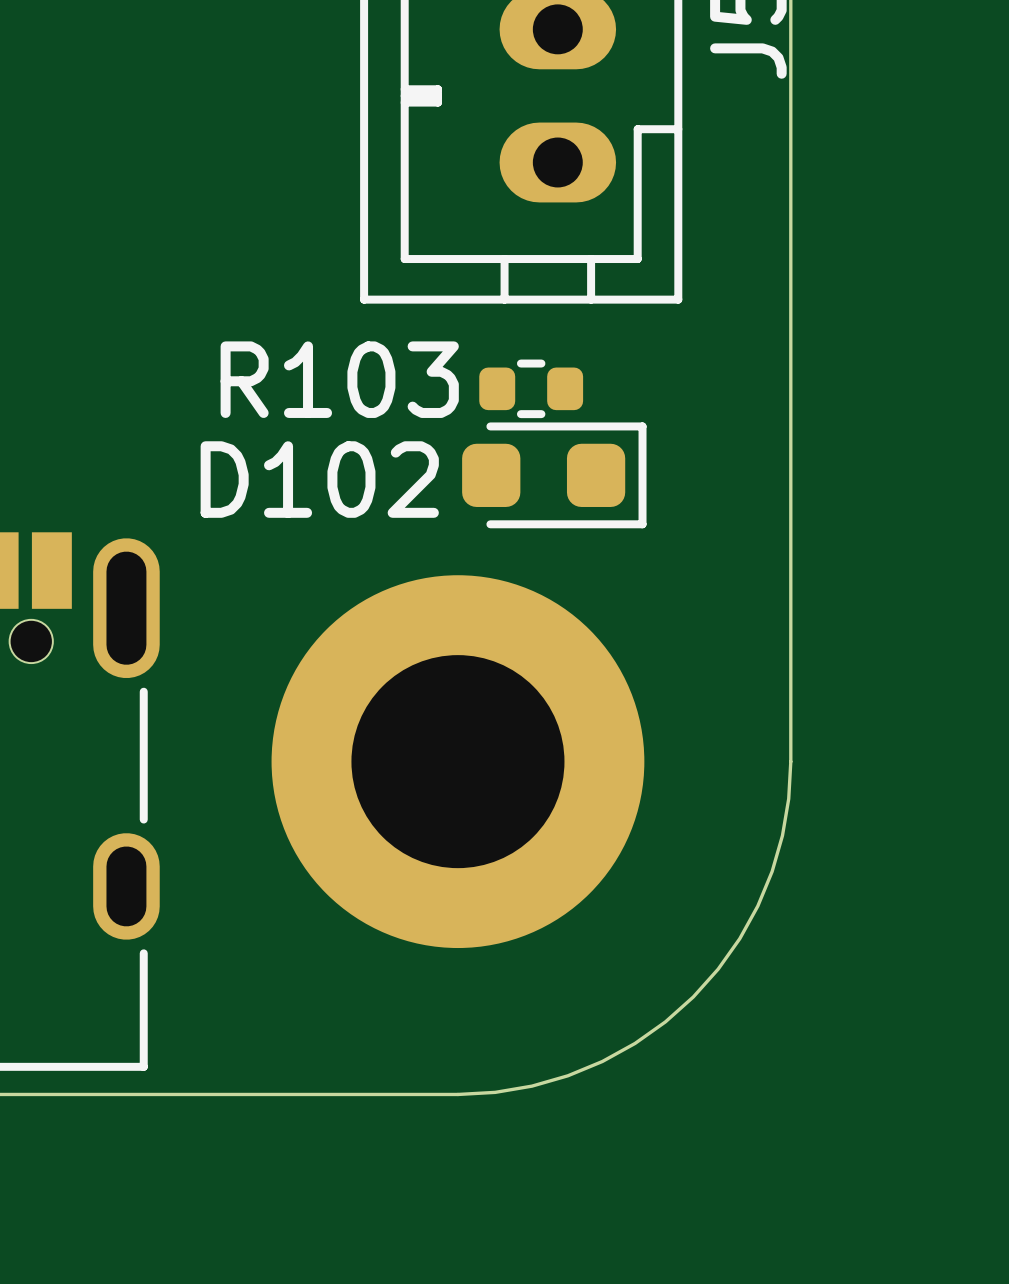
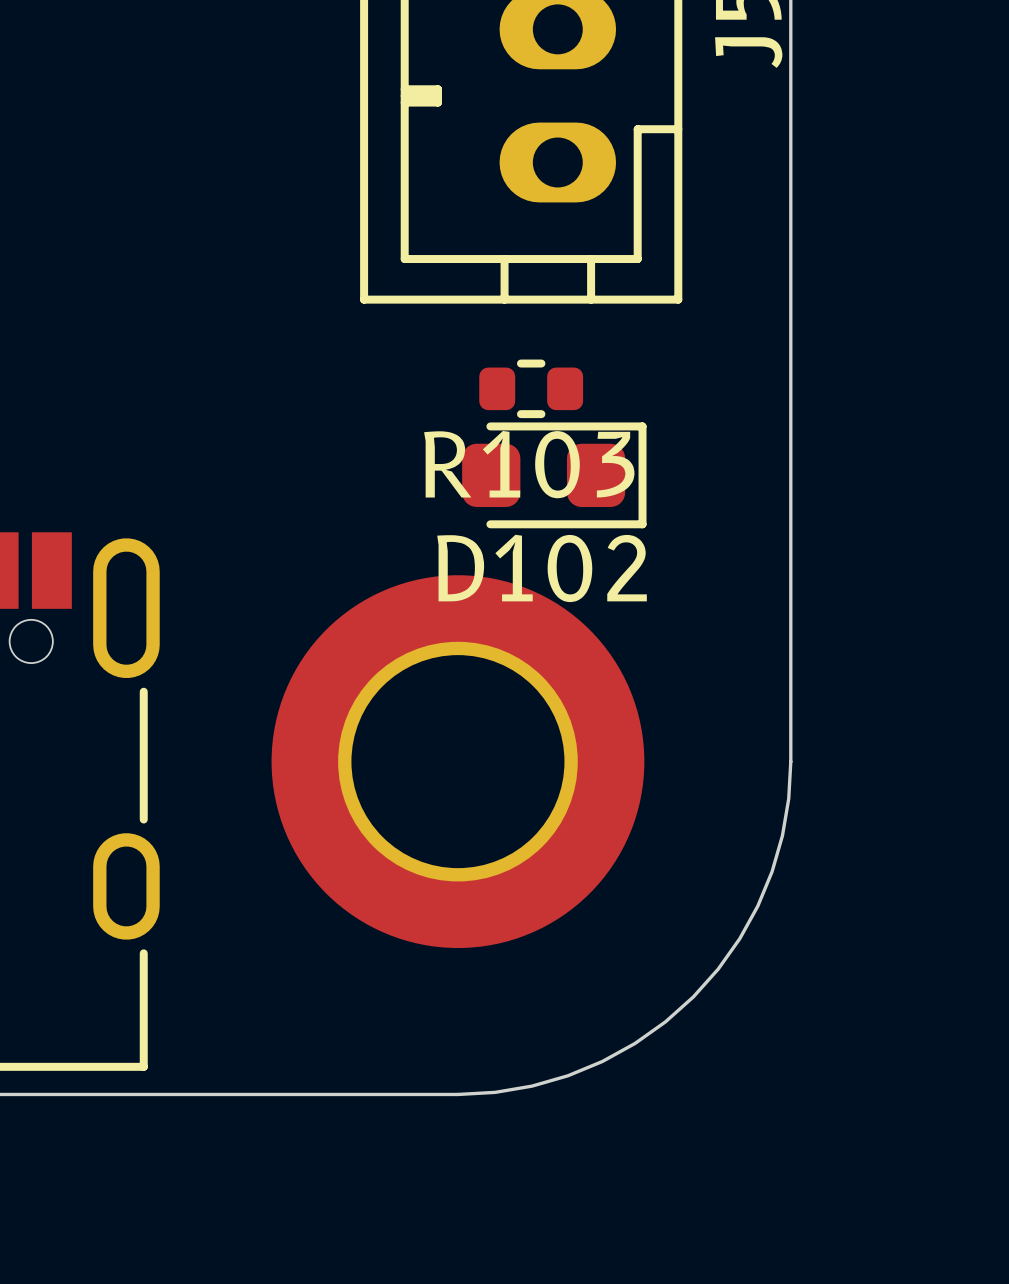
R103 name position: R103 (339, 379) -> R103 (529, 464)
D102 name position: D102 (319, 479) -> D102 (542, 568)

